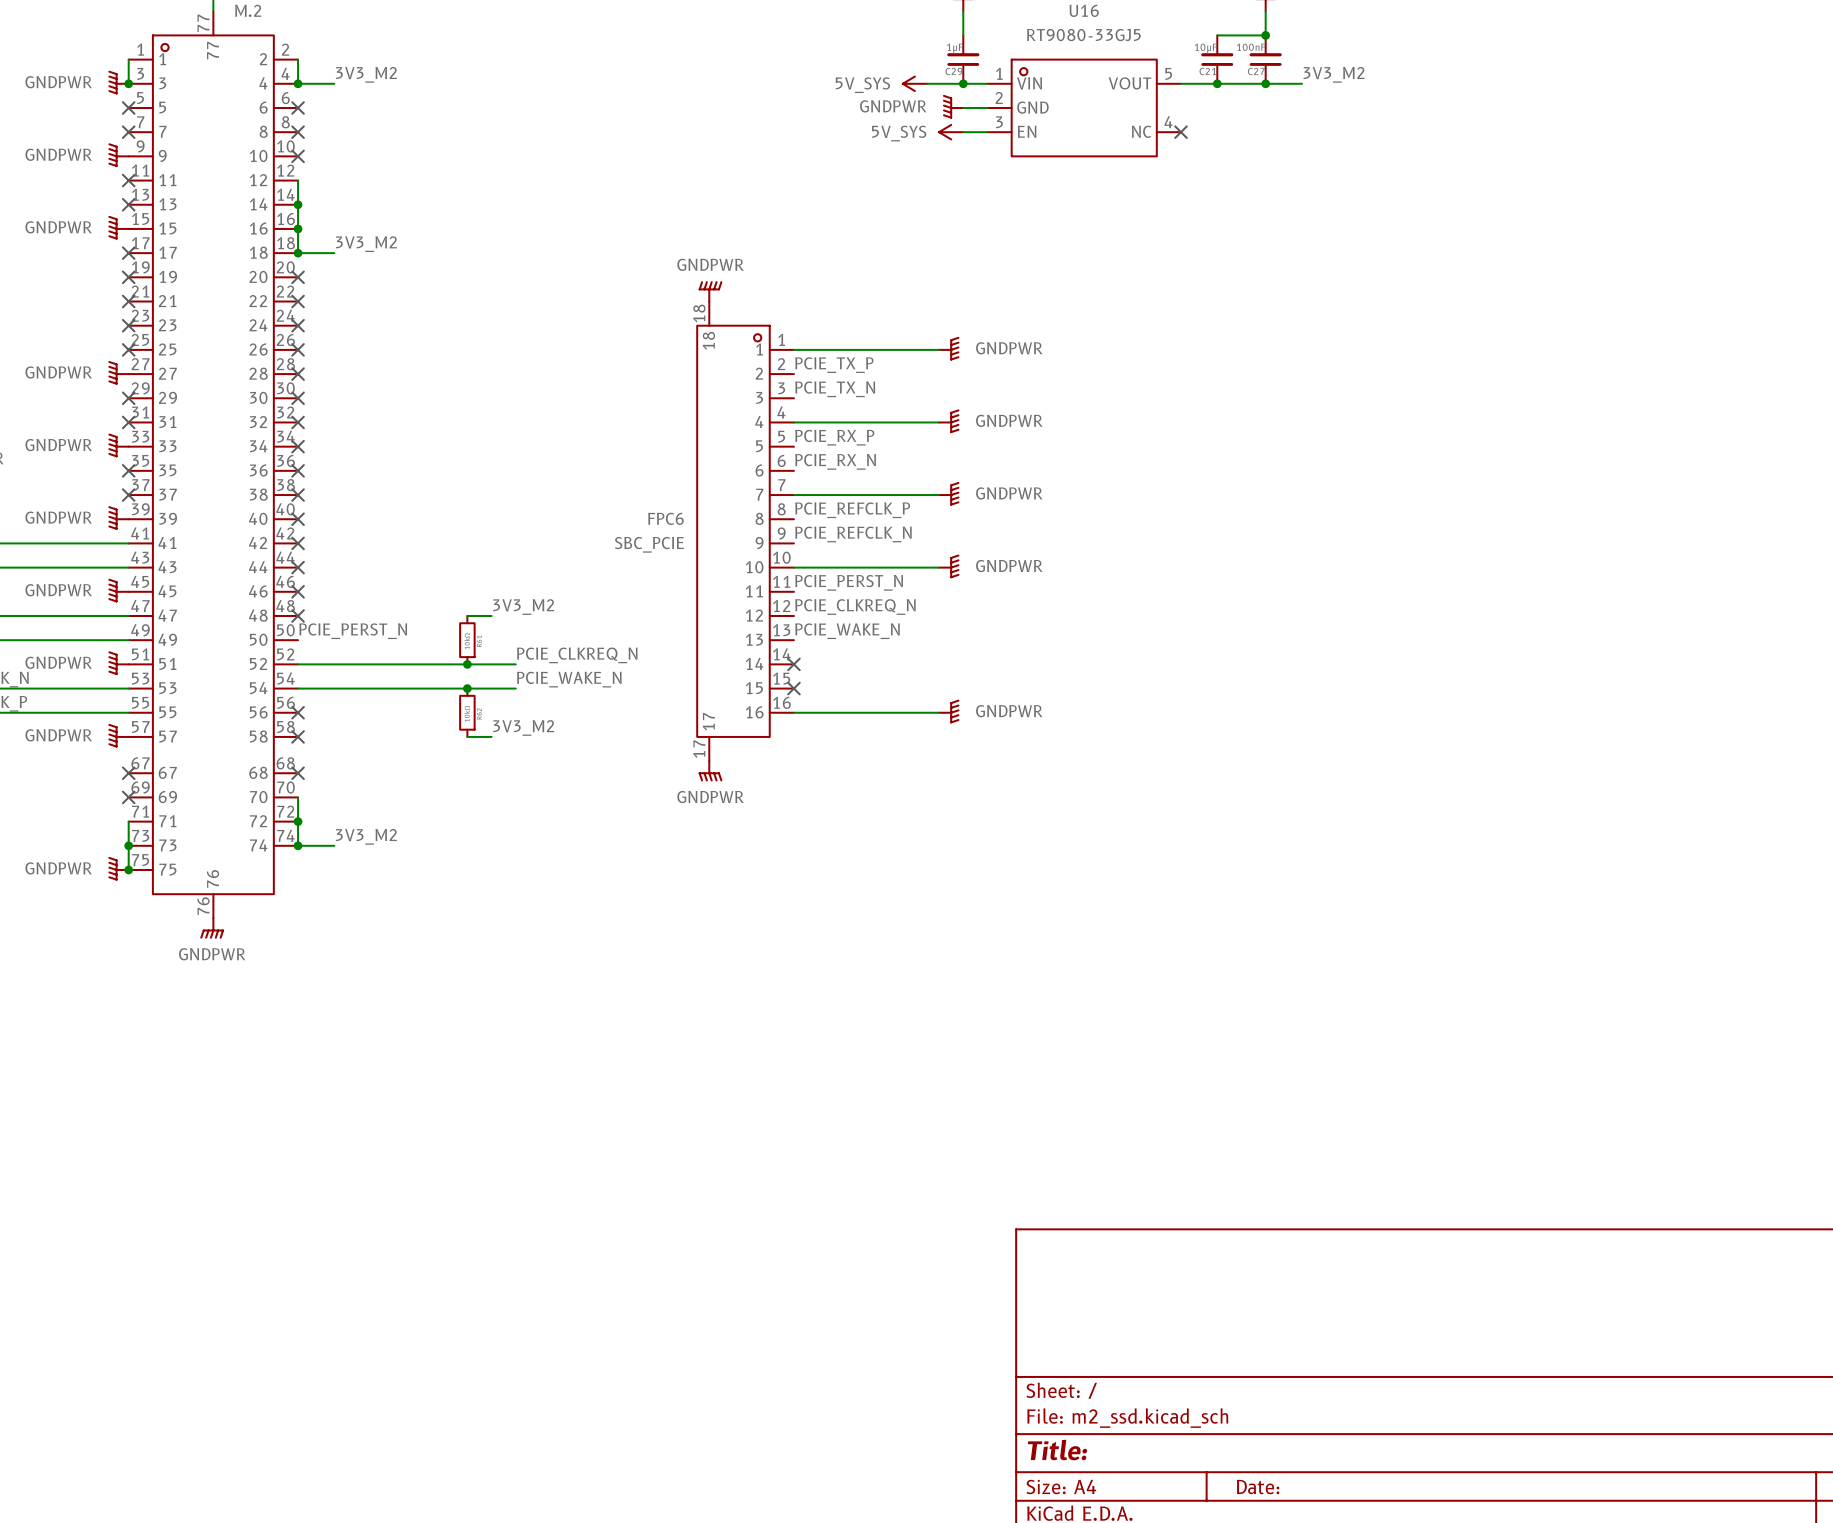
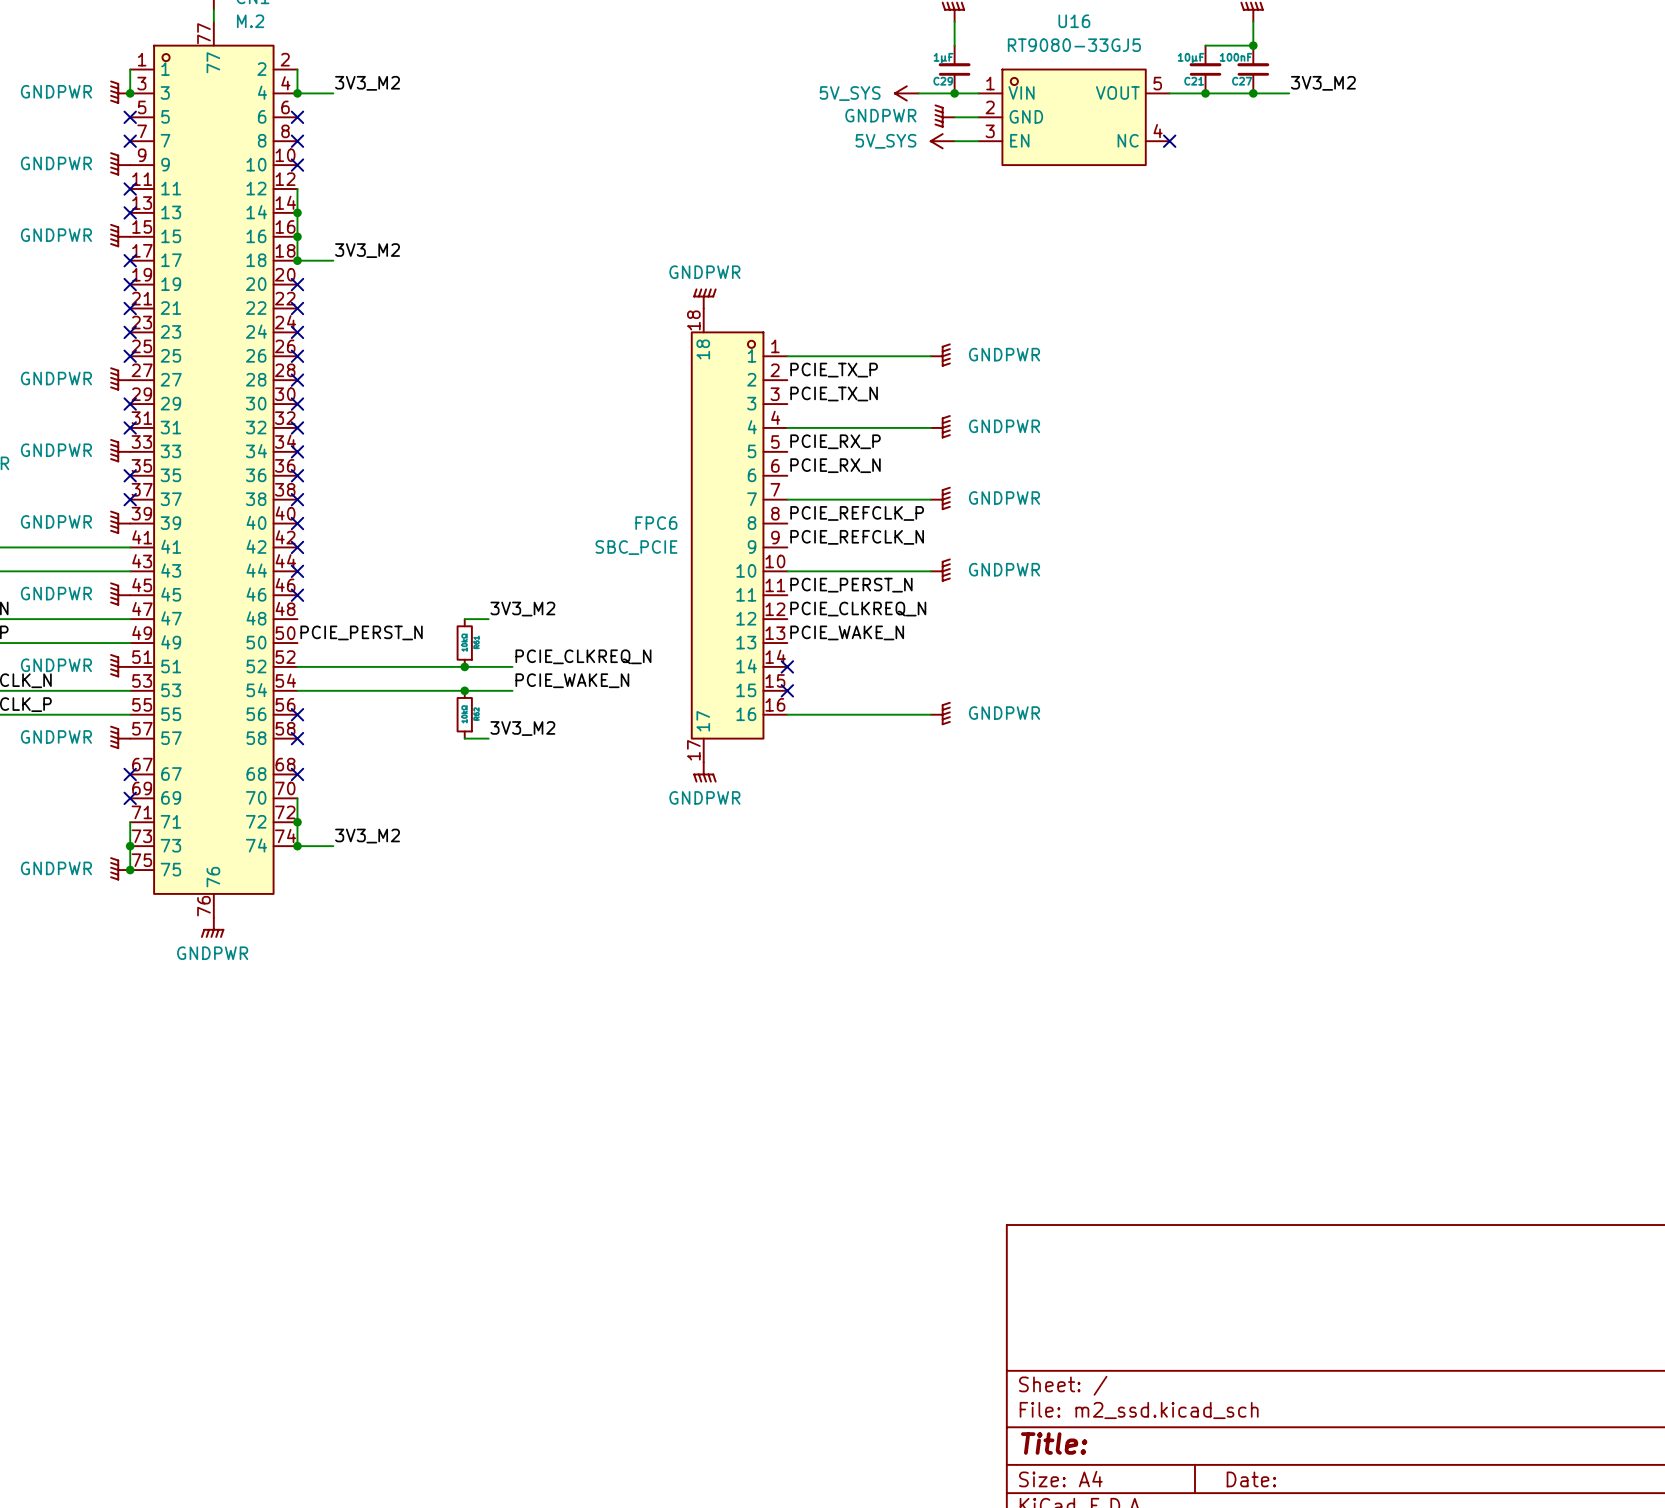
no-connect mark: (298, 615) -> none

